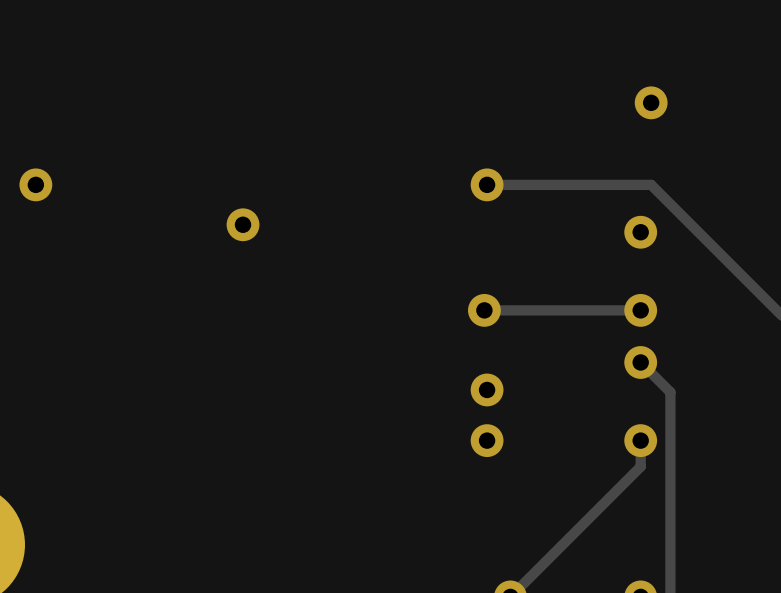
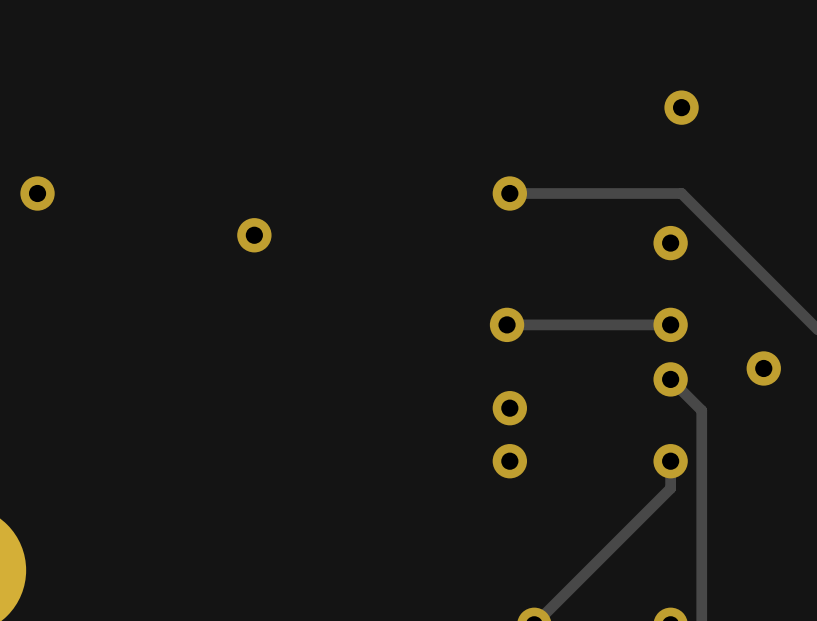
via: none -> (763, 368)

